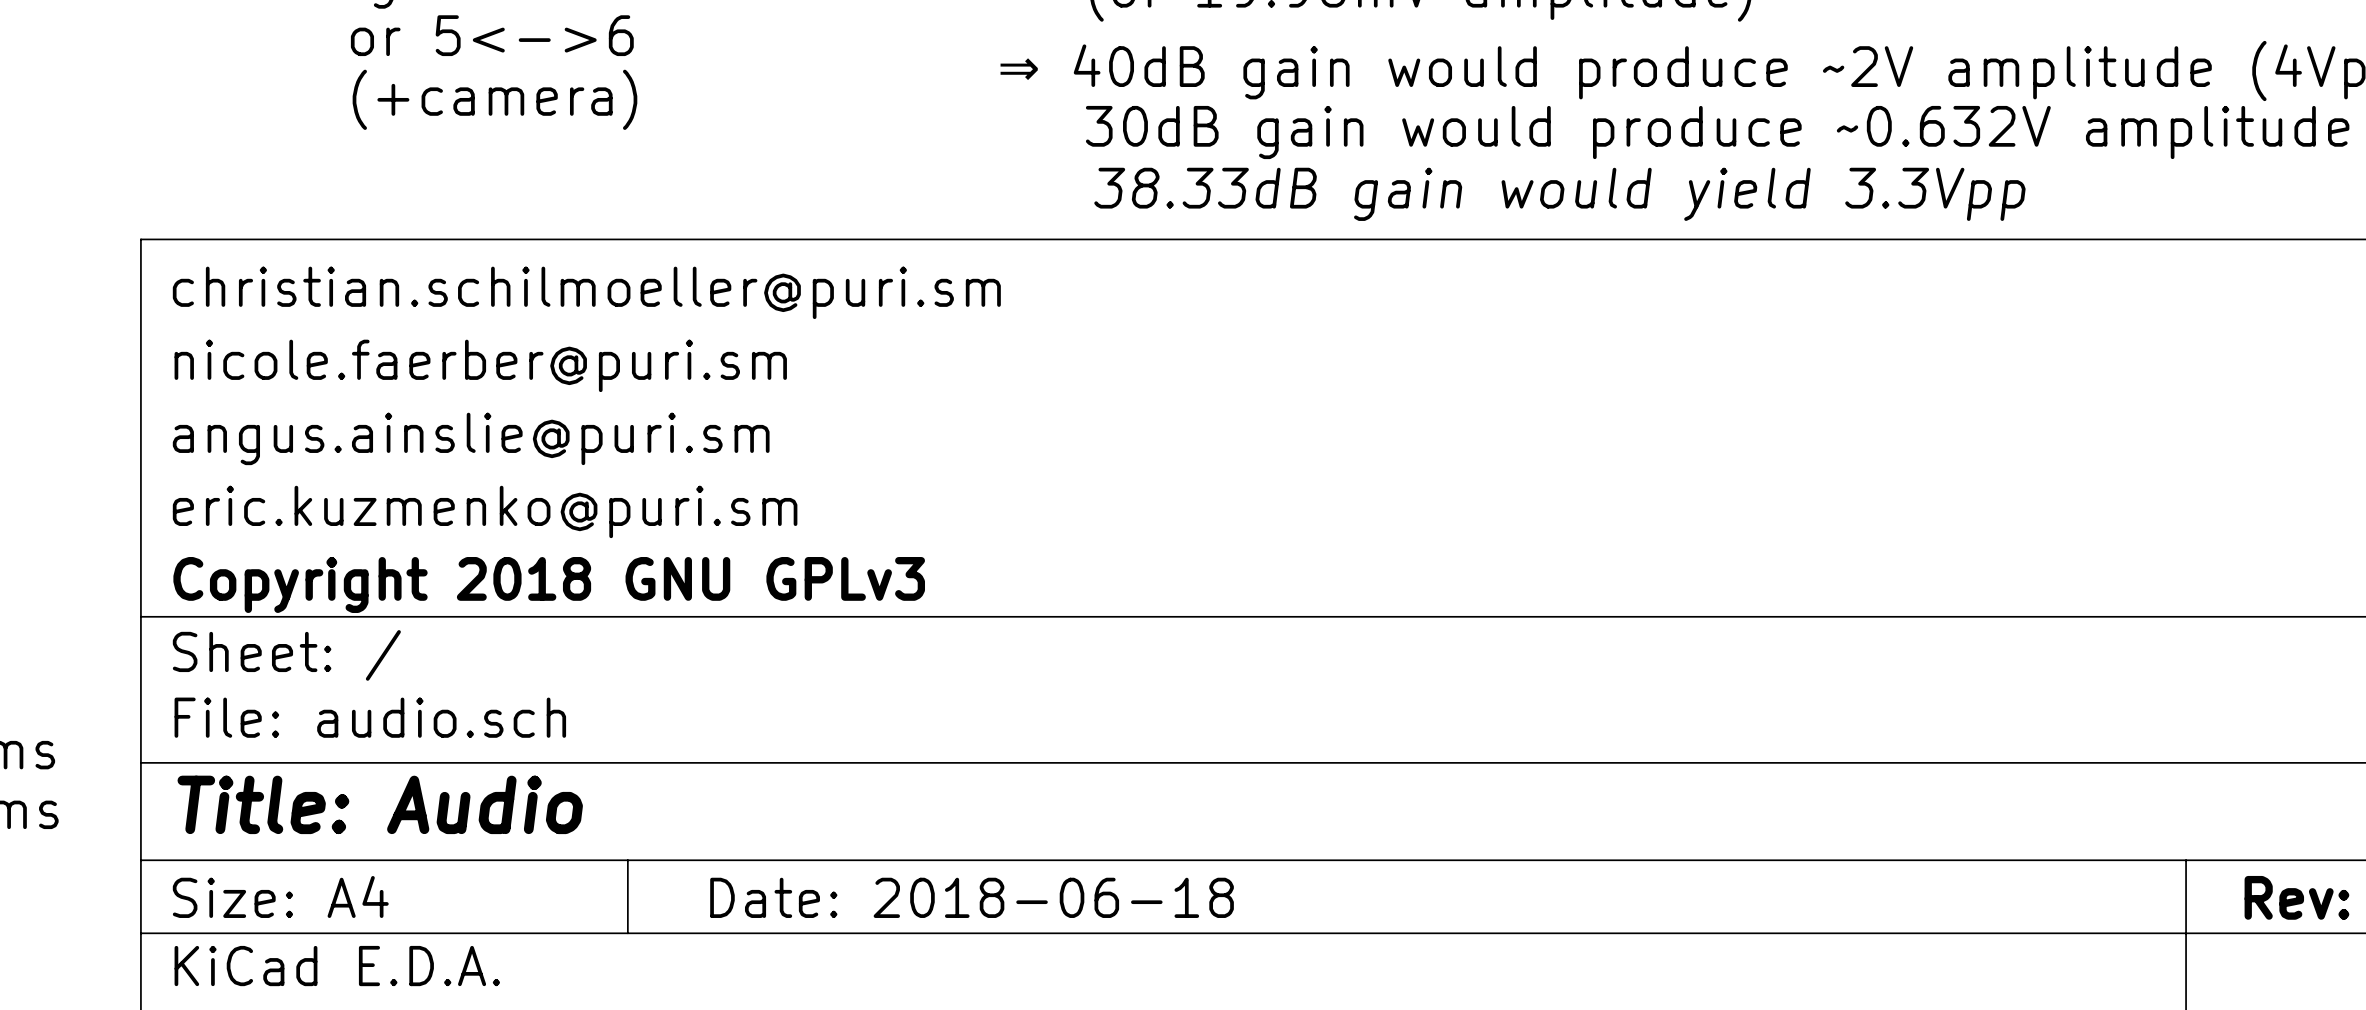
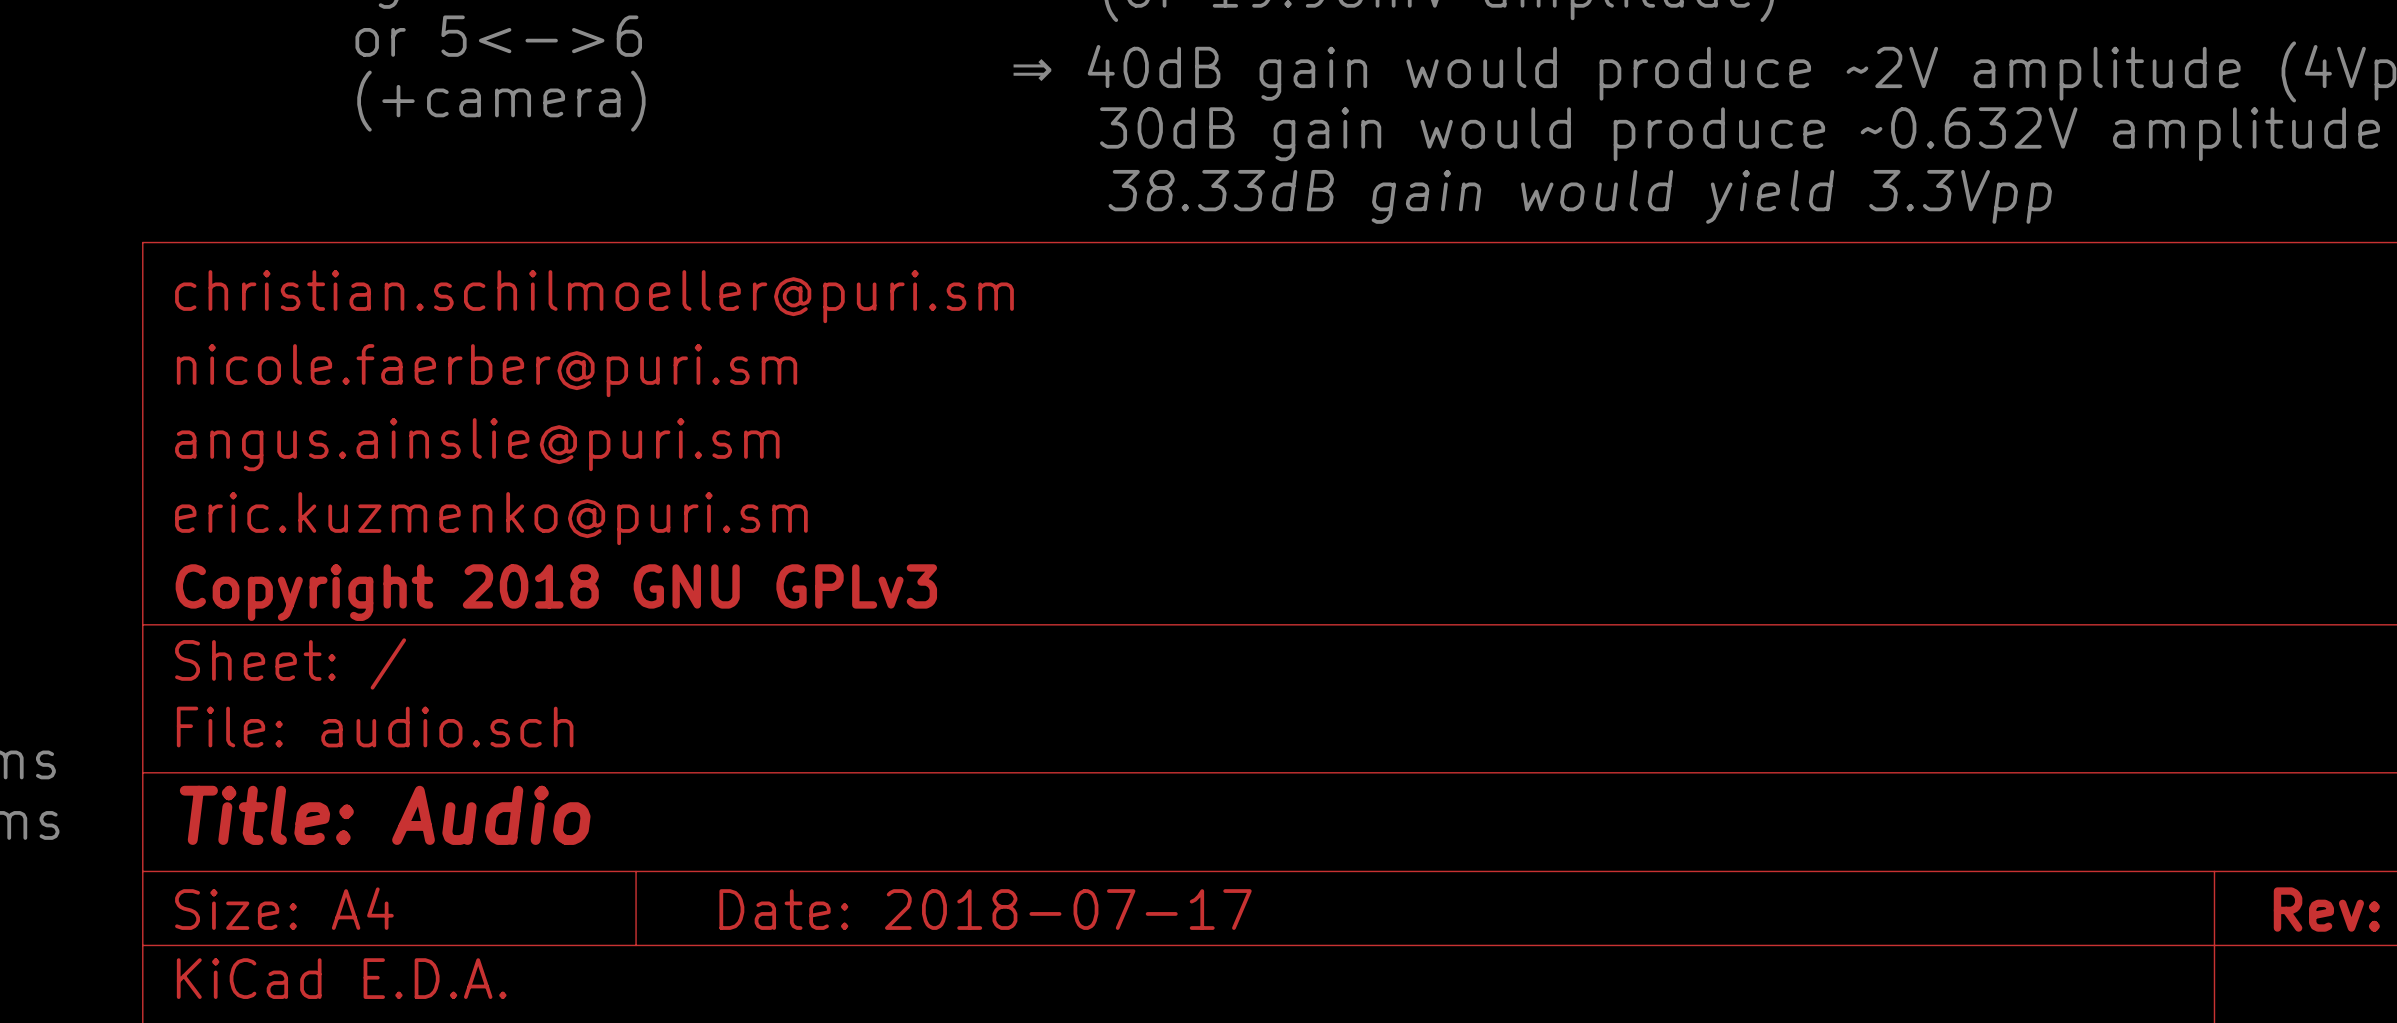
title block: Date: 2018-06-18 (972, 897) -> Date: 2018-07-17 (985, 909)

